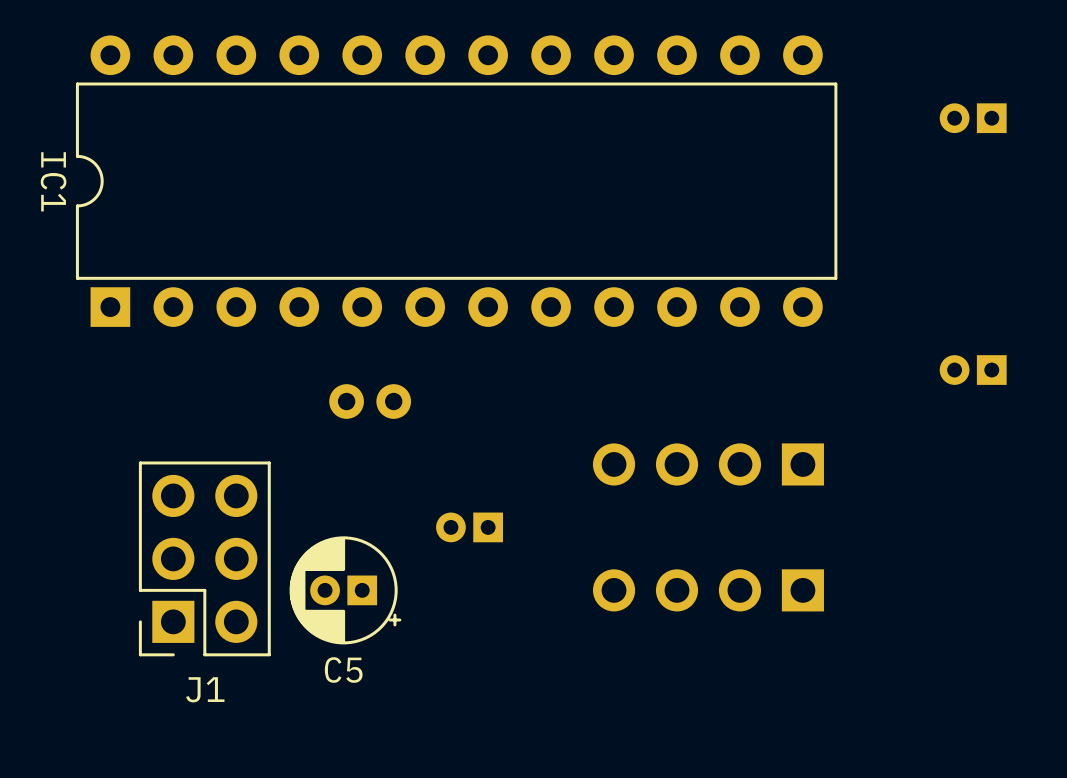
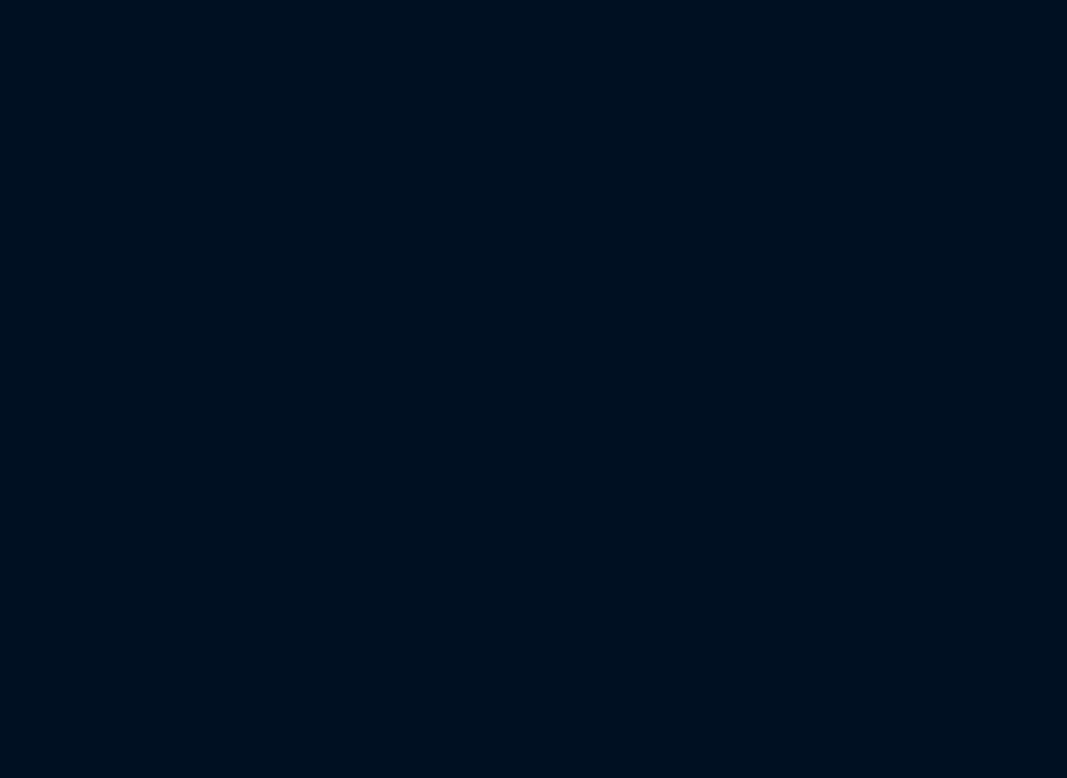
part: (973, 118) -> none
IC1: (456, 181) -> none
part: (973, 370) -> none
part: (370, 401) -> none
part: (708, 464) -> none
part: (469, 527) -> none
J1: (204, 558) -> none
C5: (345, 590) -> none
part: (708, 590) -> none

